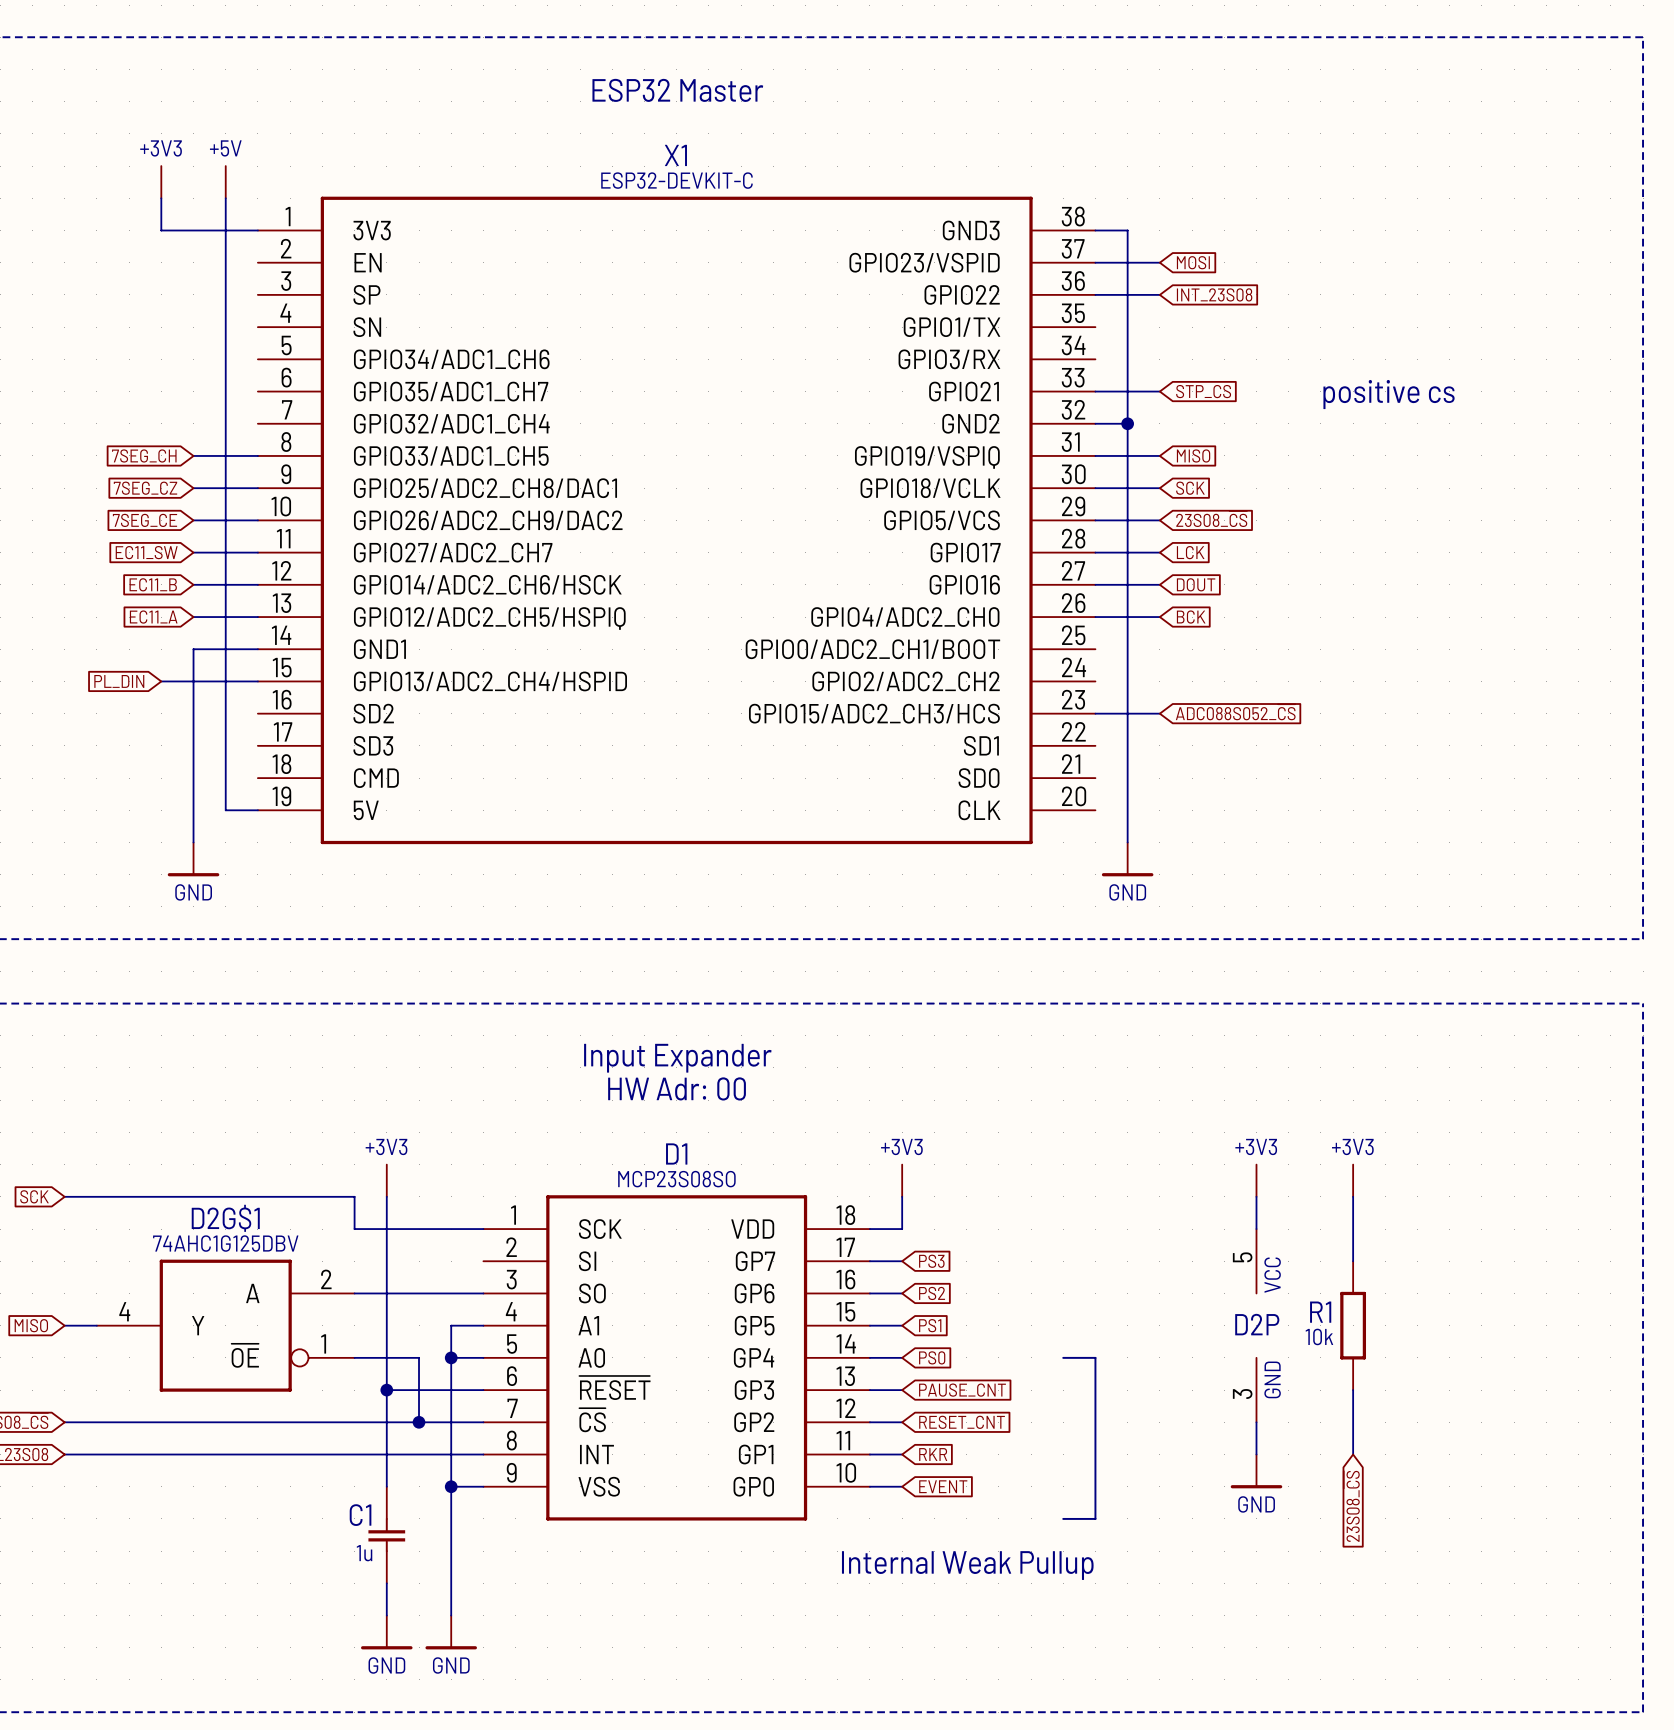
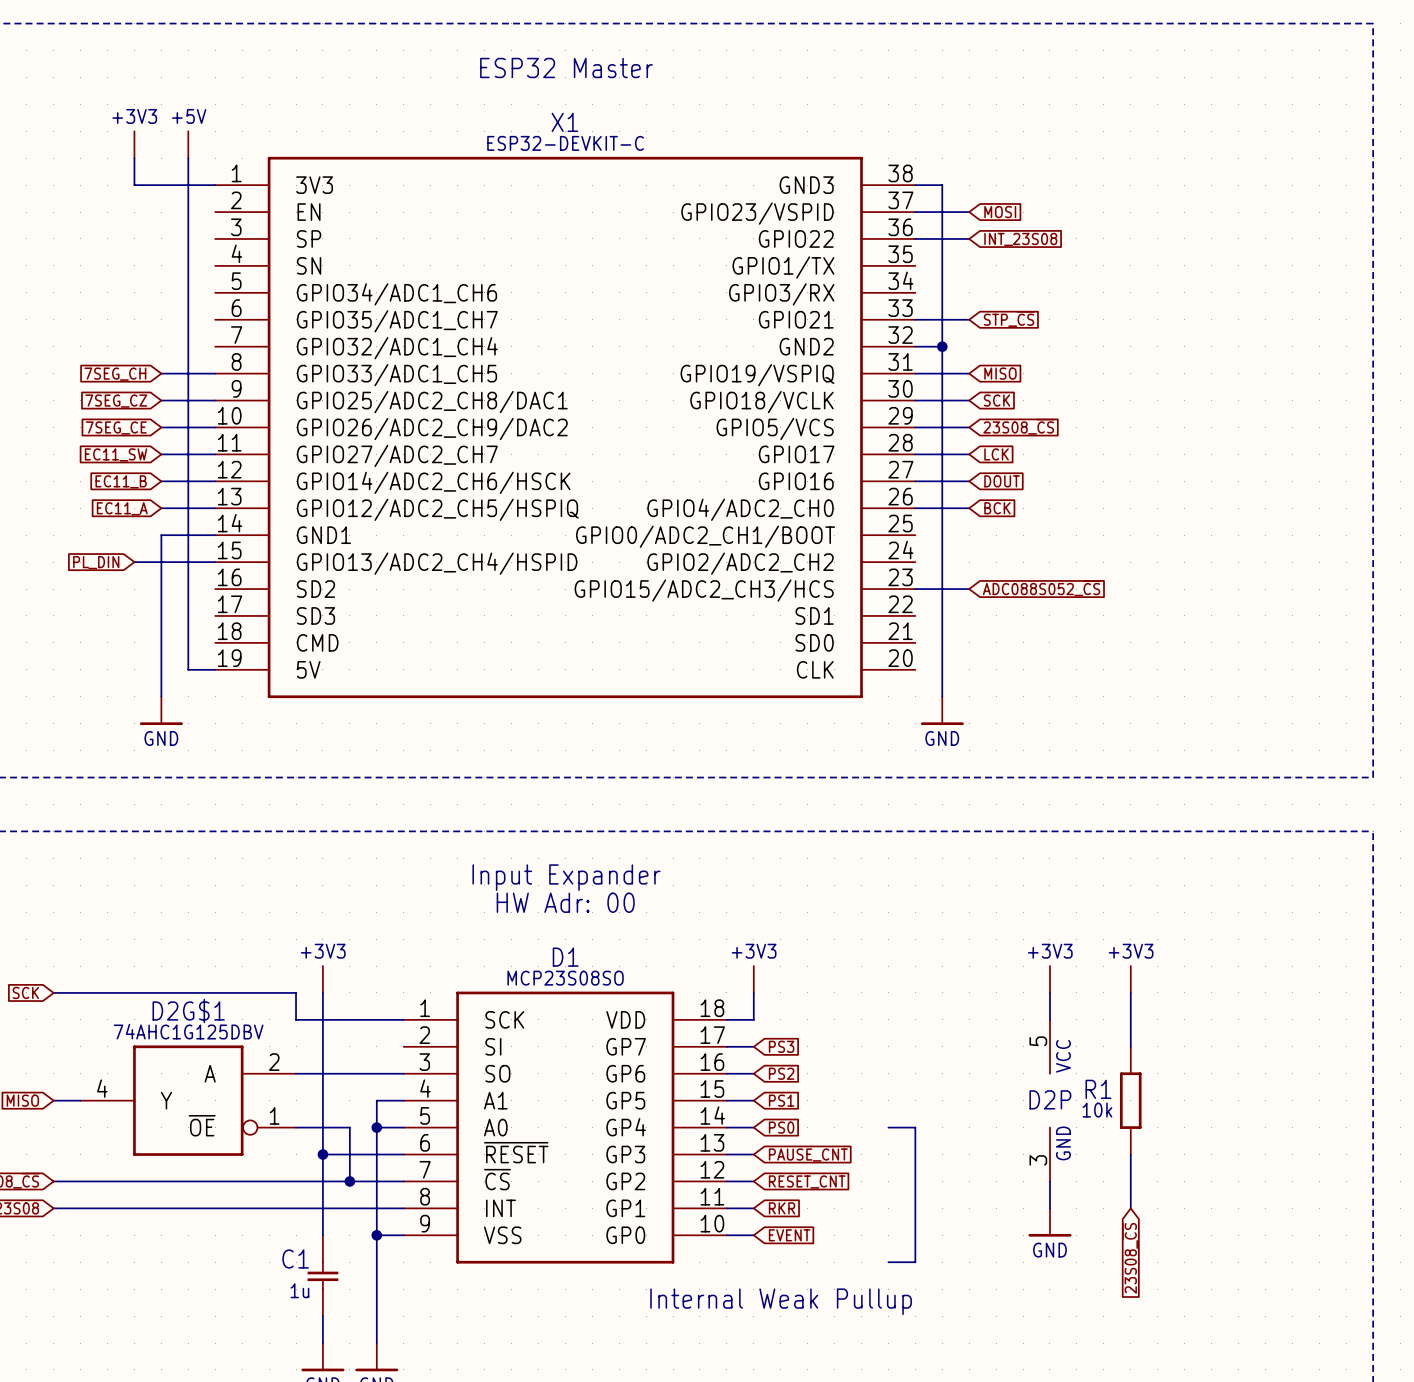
global label: STP_CS (1203, 391) -> STP_~{CS} (1009, 319)
text: positive cs (1389, 394) -> none

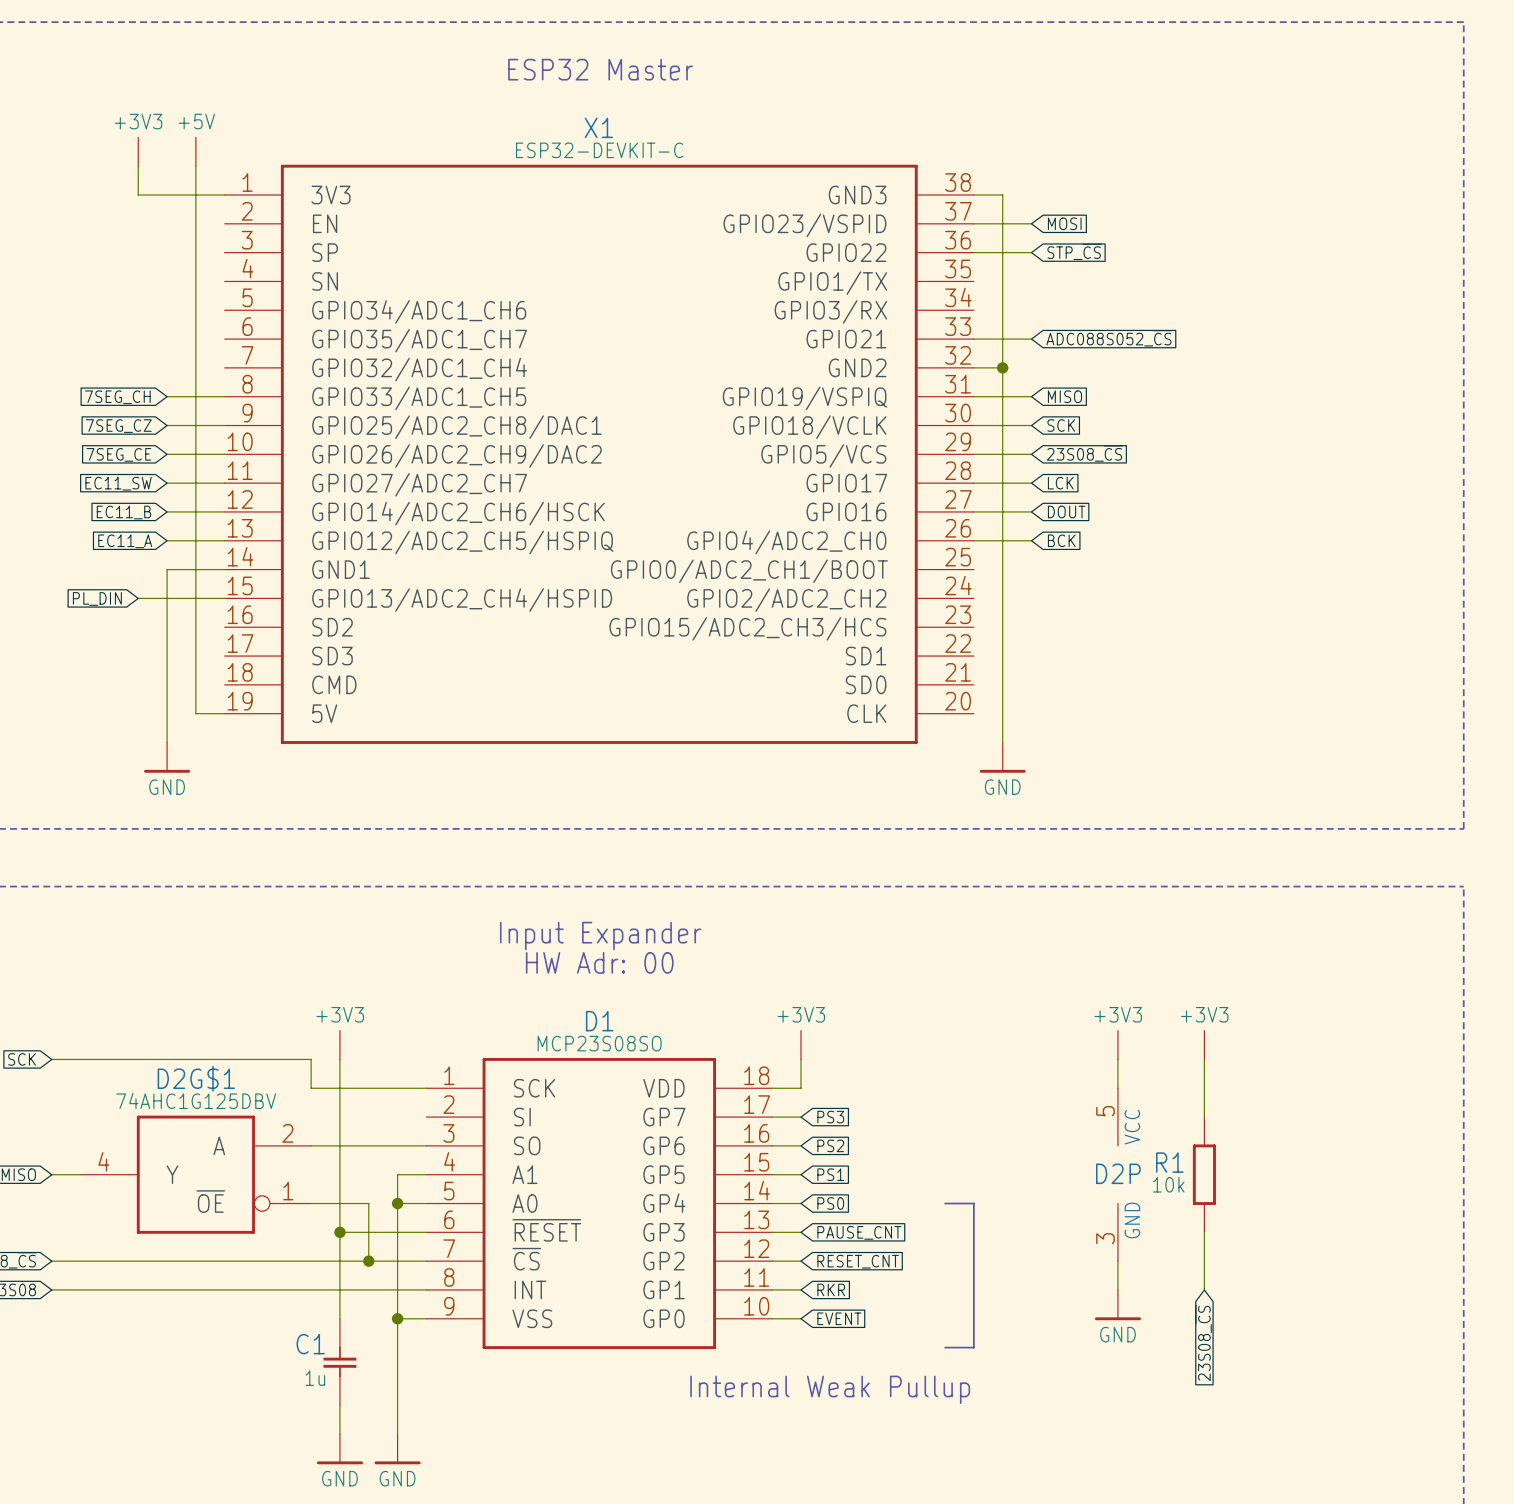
global label: INT_23S08 (1020, 239) -> STP_~{CS} (1074, 251)
global label: STP_~{CS} (1009, 319) -> ADC088S052_~{CS} (1109, 338)
global label: ADC088S052_~{CS} (1041, 588) -> none
wire: (915, 589) (969, 589) -> none

